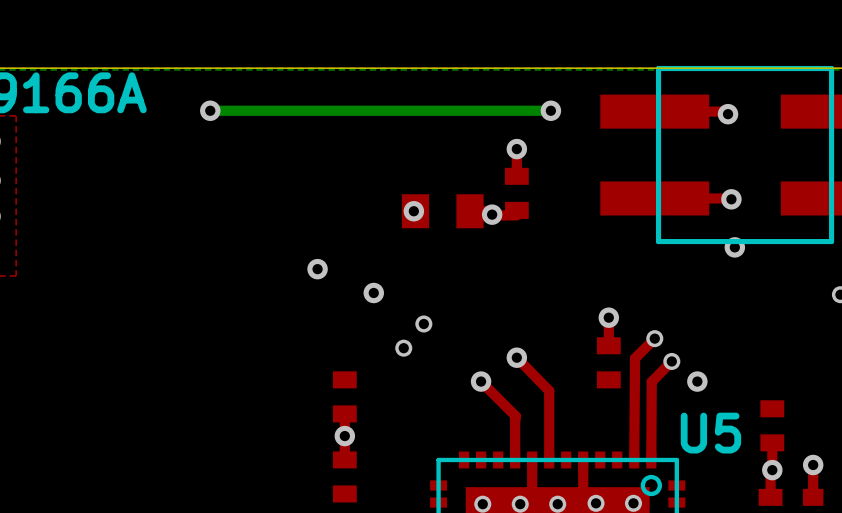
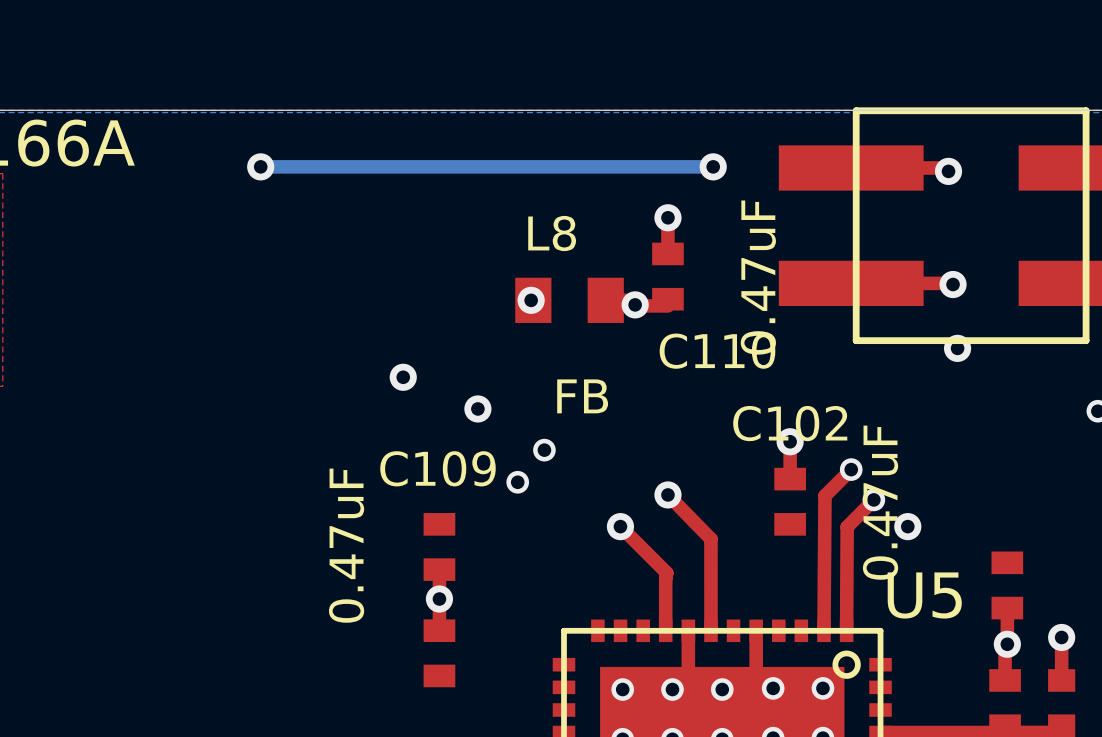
L8 name: none -> L8 (552, 233)
C110 value: none -> 0.47uF (758, 277)
C110 name: none -> C110 (717, 351)
L8 value: none -> FB (582, 396)
C102 name: none -> C102 (790, 423)
C109 name: none -> C109 (437, 468)
C102 value: none -> 0.47uF (880, 502)
C109 value: none -> 0.47uF (346, 545)

